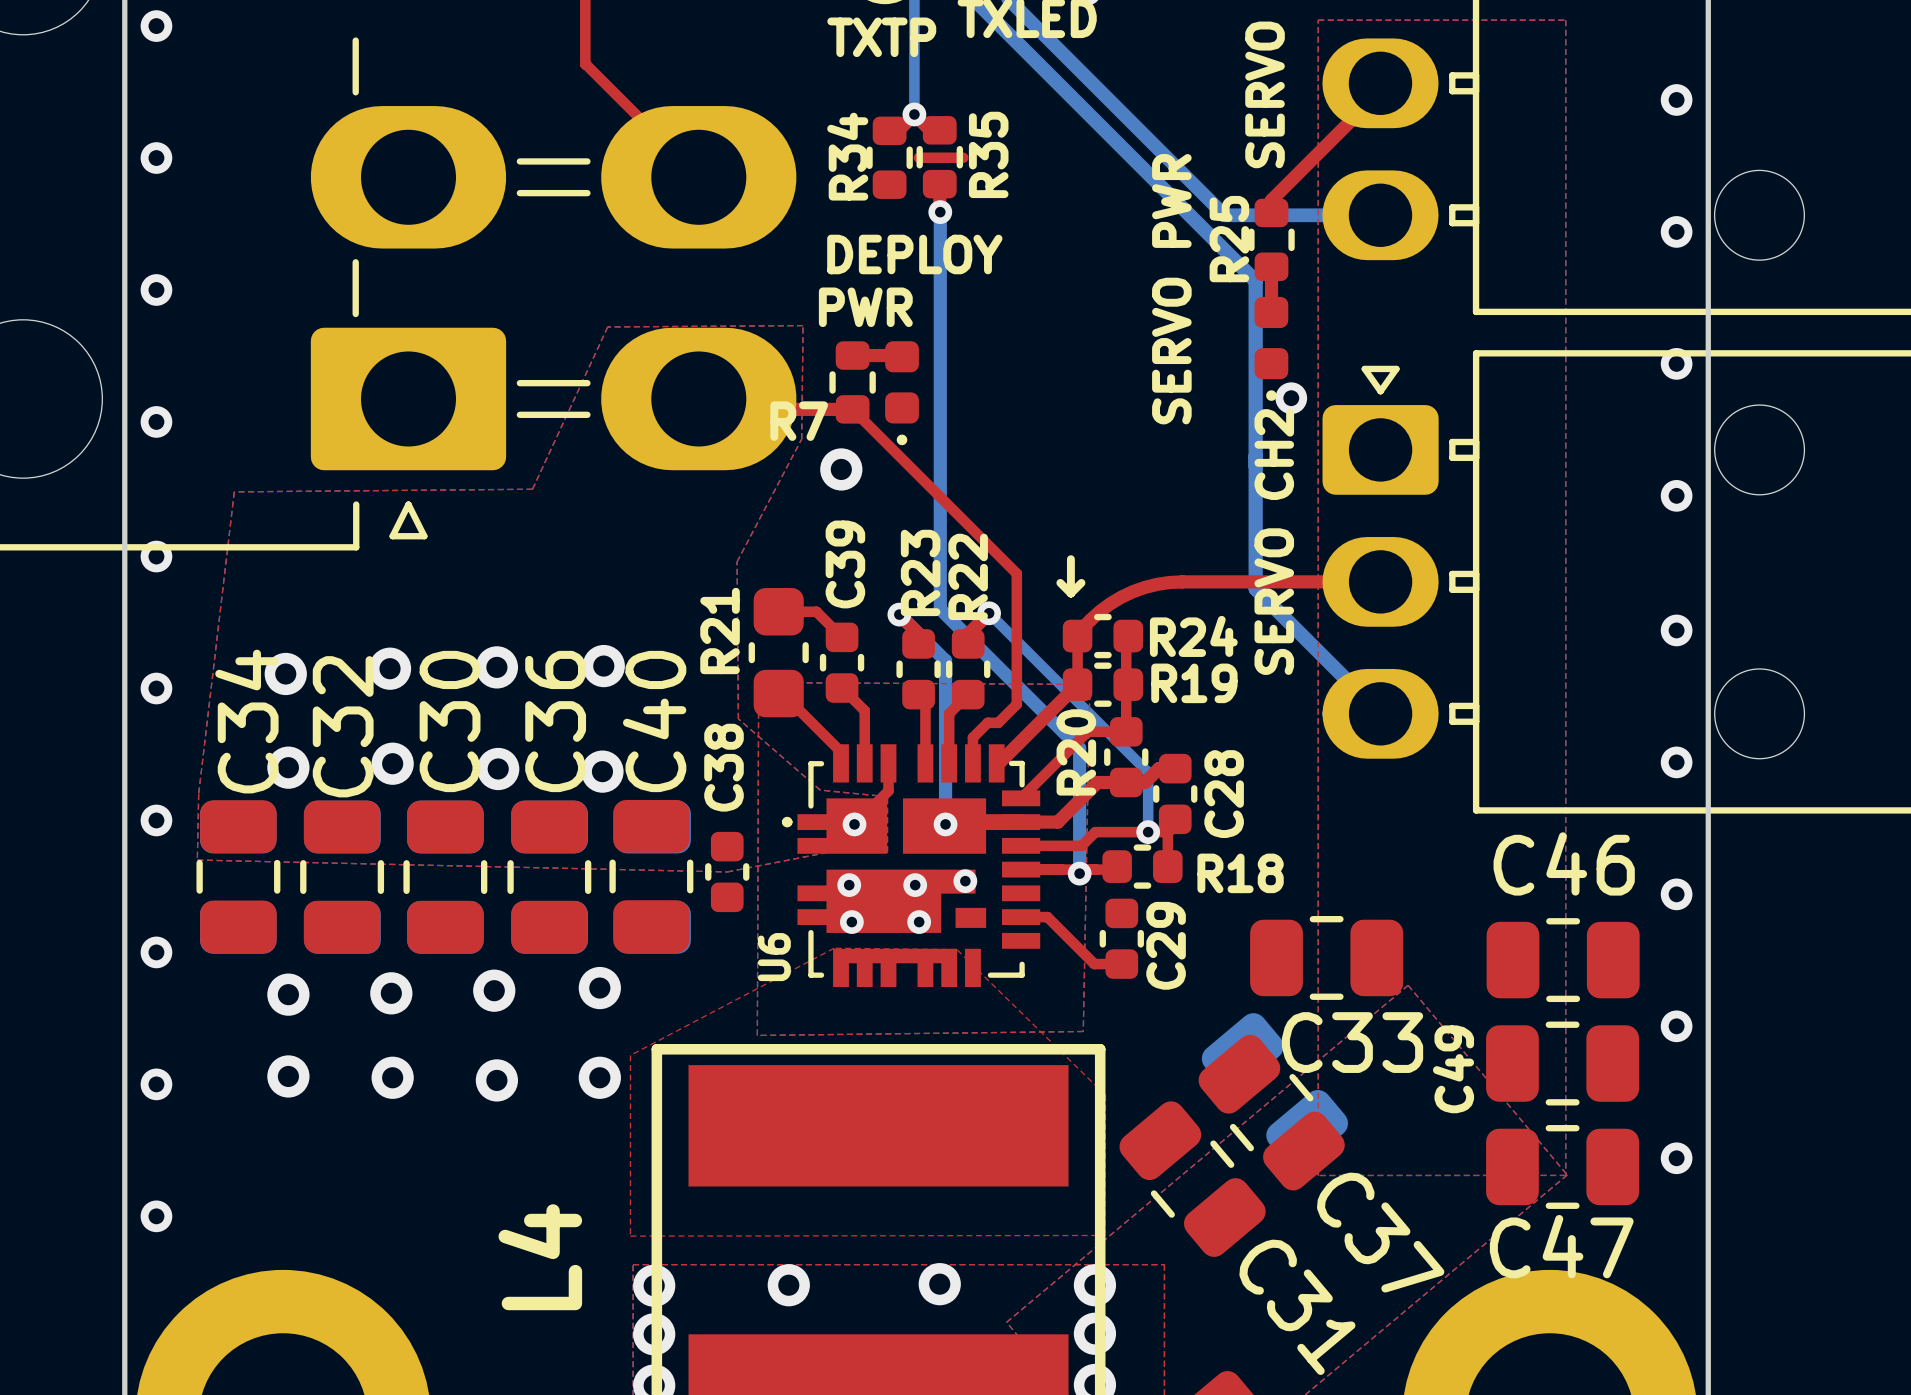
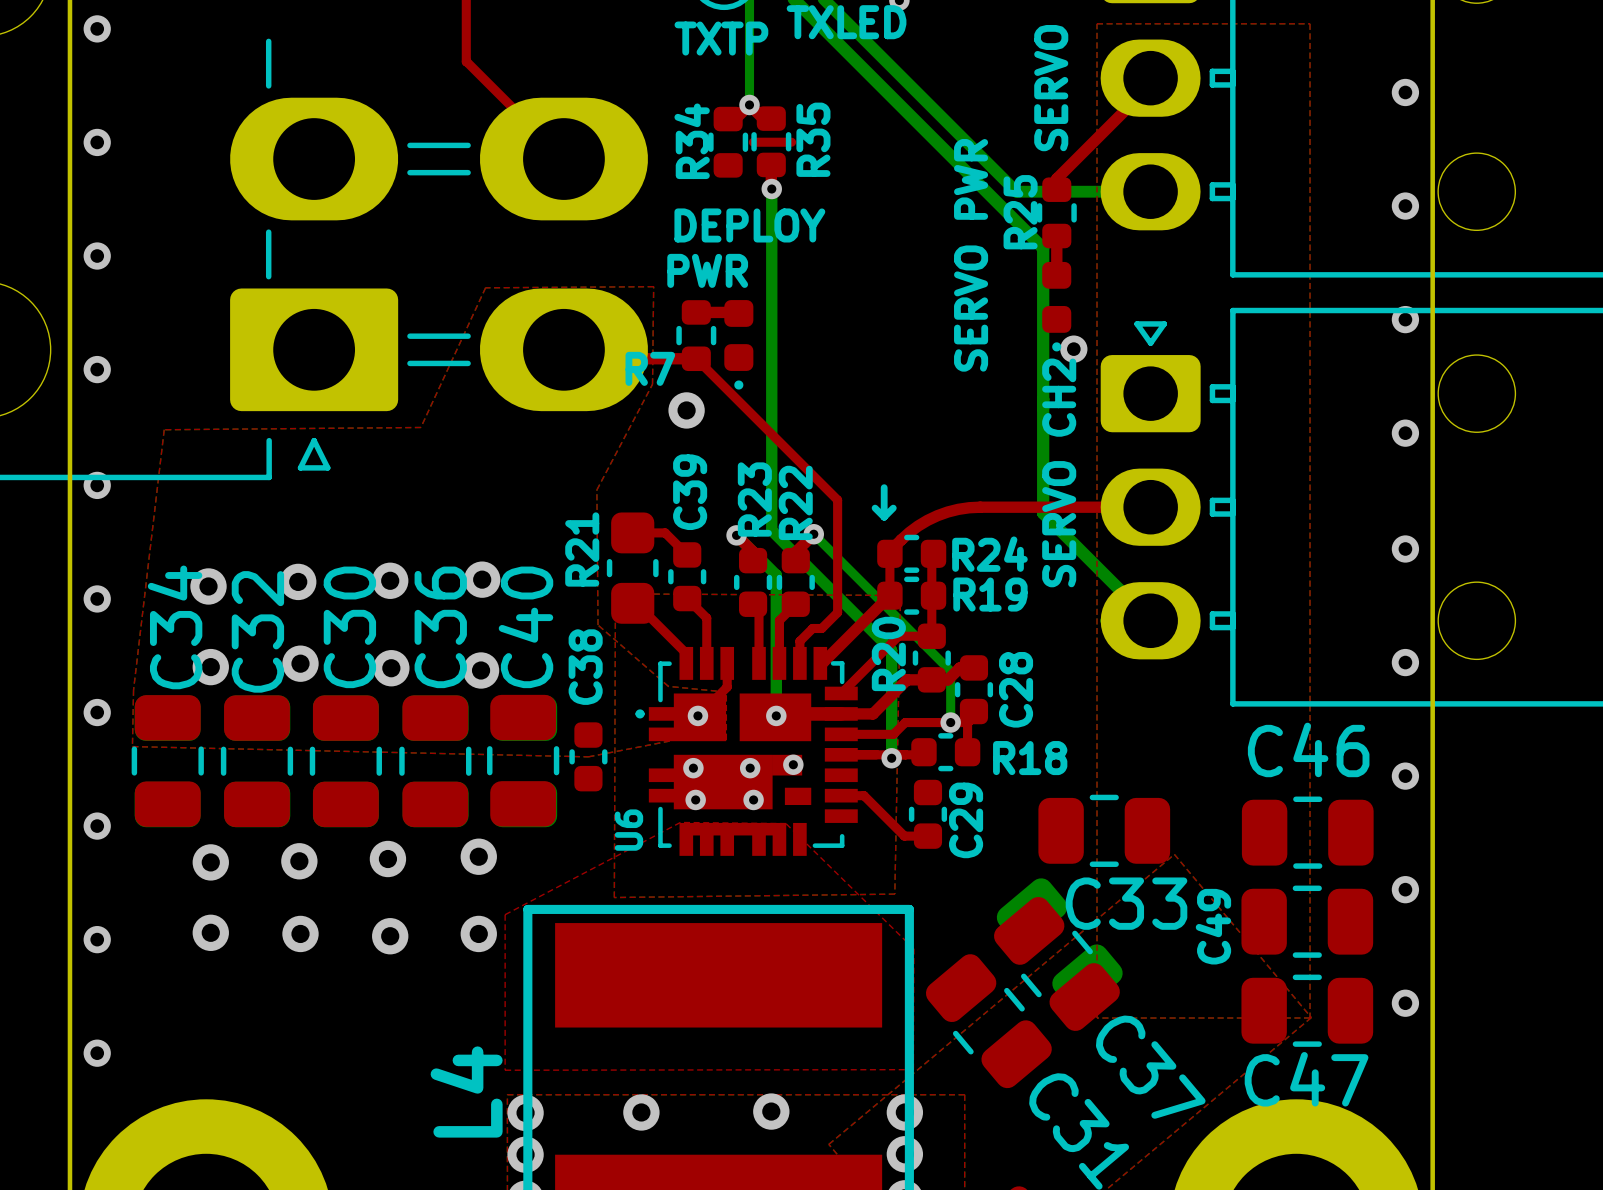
L4 name position: L4 (540, 1257) -> L4 (466, 1092)

